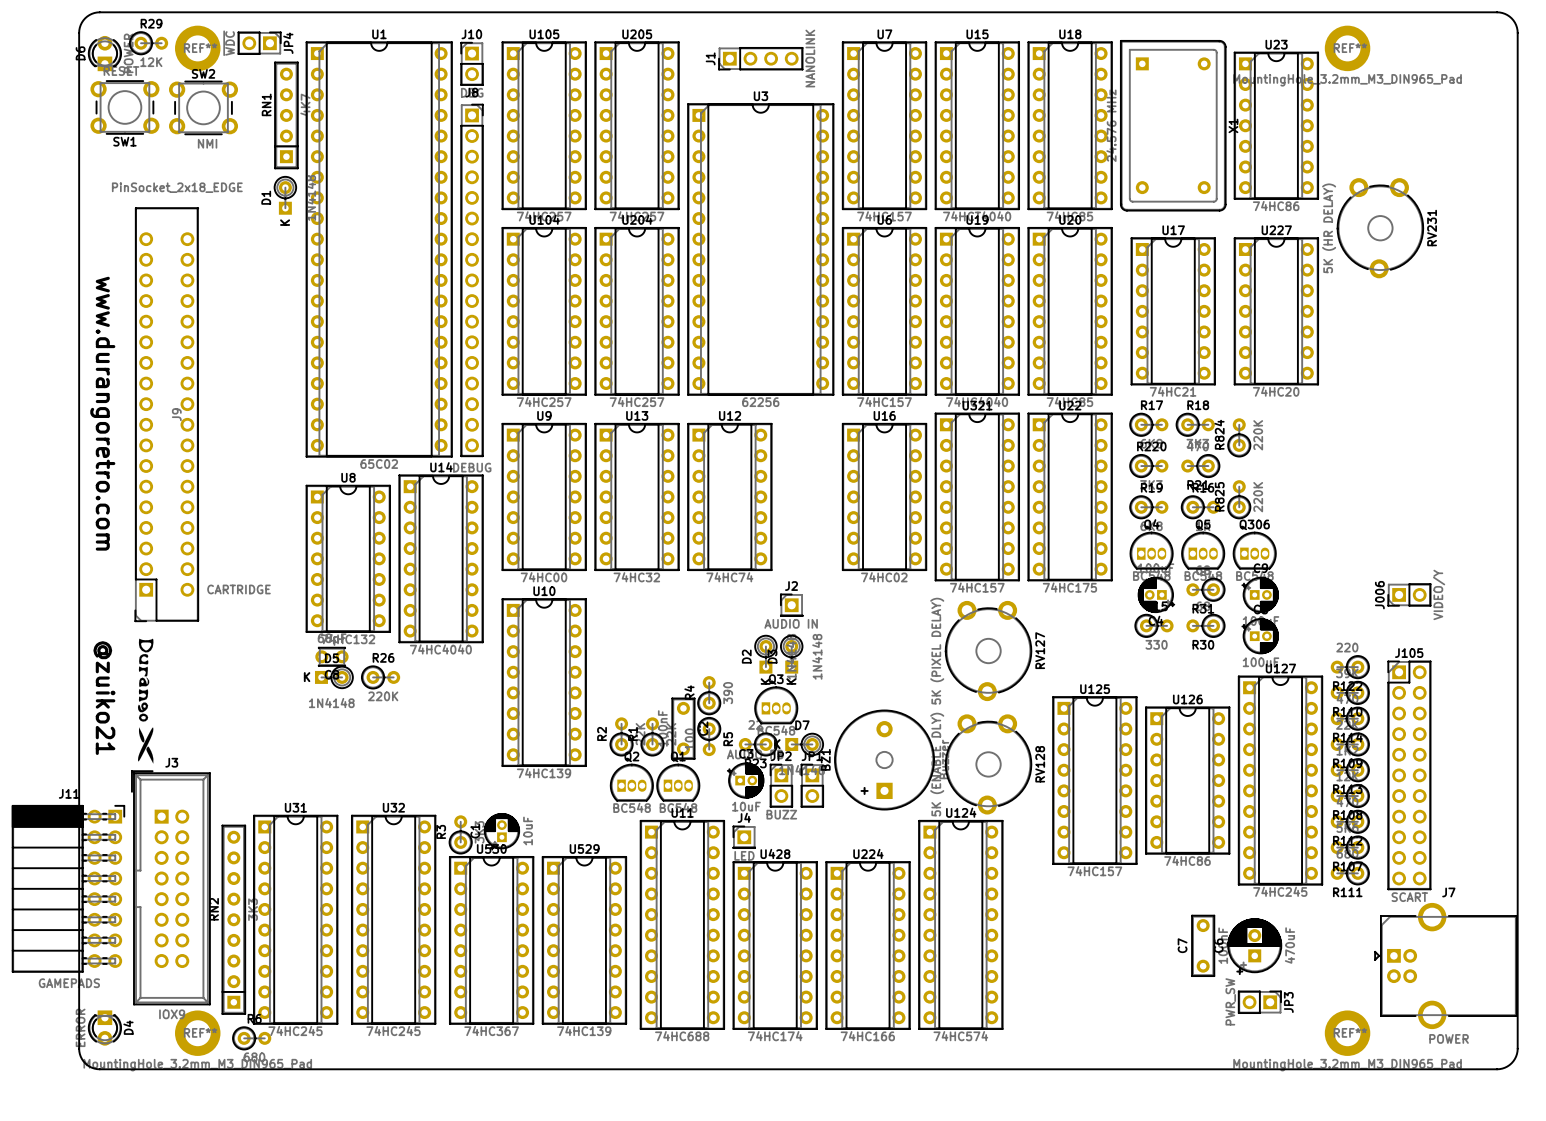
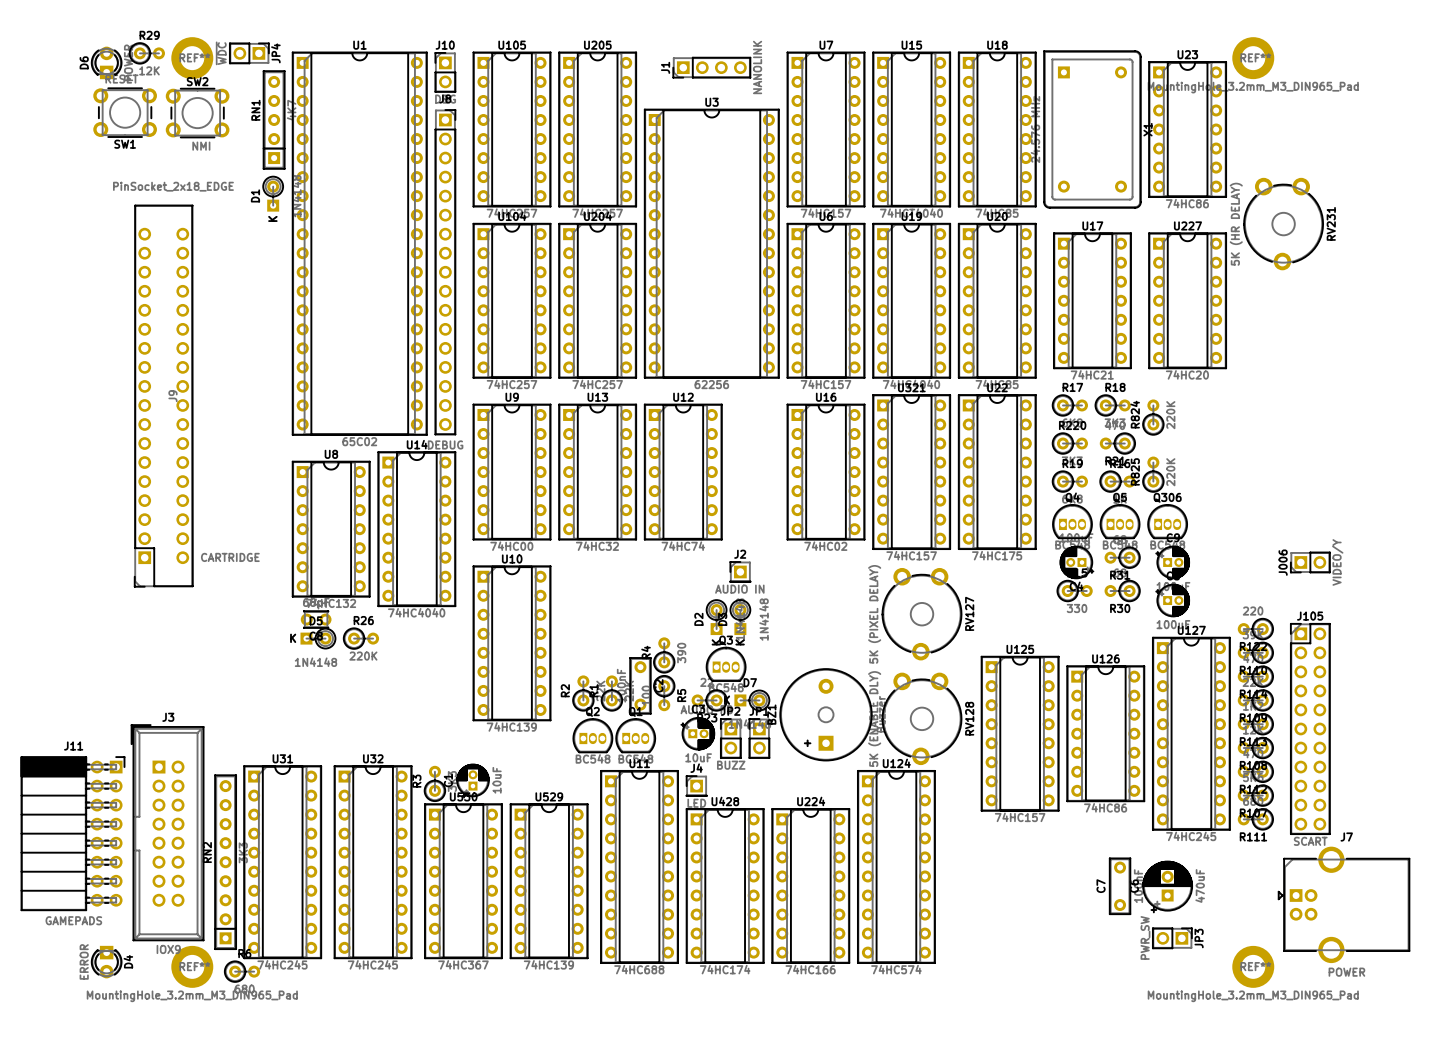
board edge: (99, 12) (1497, 12) (1509, 16) (1514, 22) (1517, 32) (1517, 1048) (1513, 1061) (1507, 1066) (1497, 1069) (99, 1069) (87, 1065) (81, 1058) (79, 1048) (79, 32) (80, 25) (85, 18) (91, 13) (99, 12) -> none
text: www.durangoretro.com (102, 413) -> none
drawing: [137, 638, 154, 764] -> none
text: @zuiko21 (104, 698) -> none

